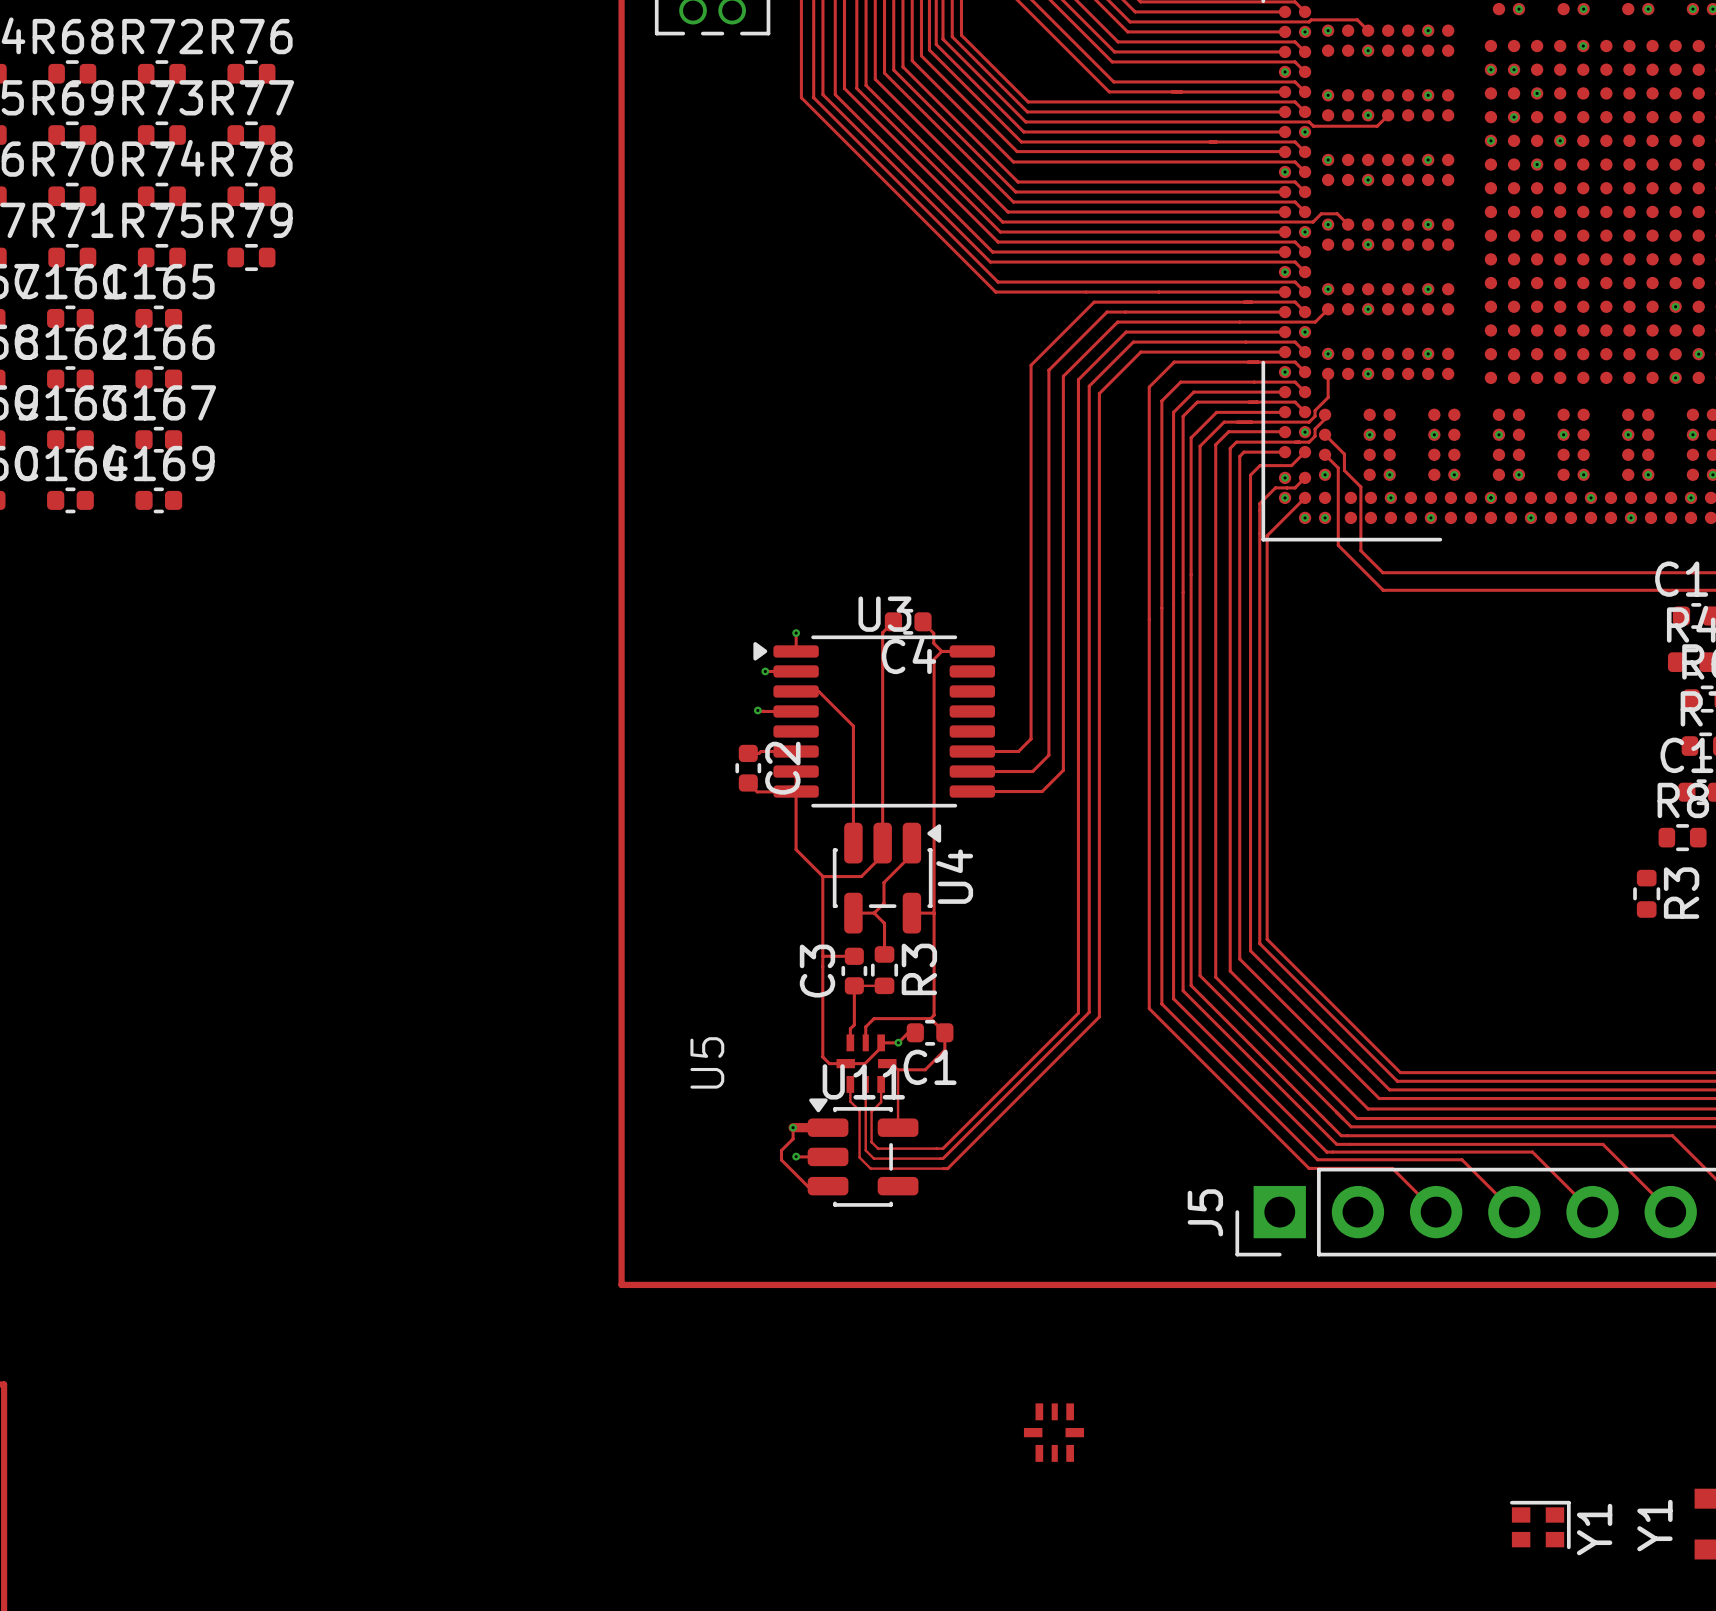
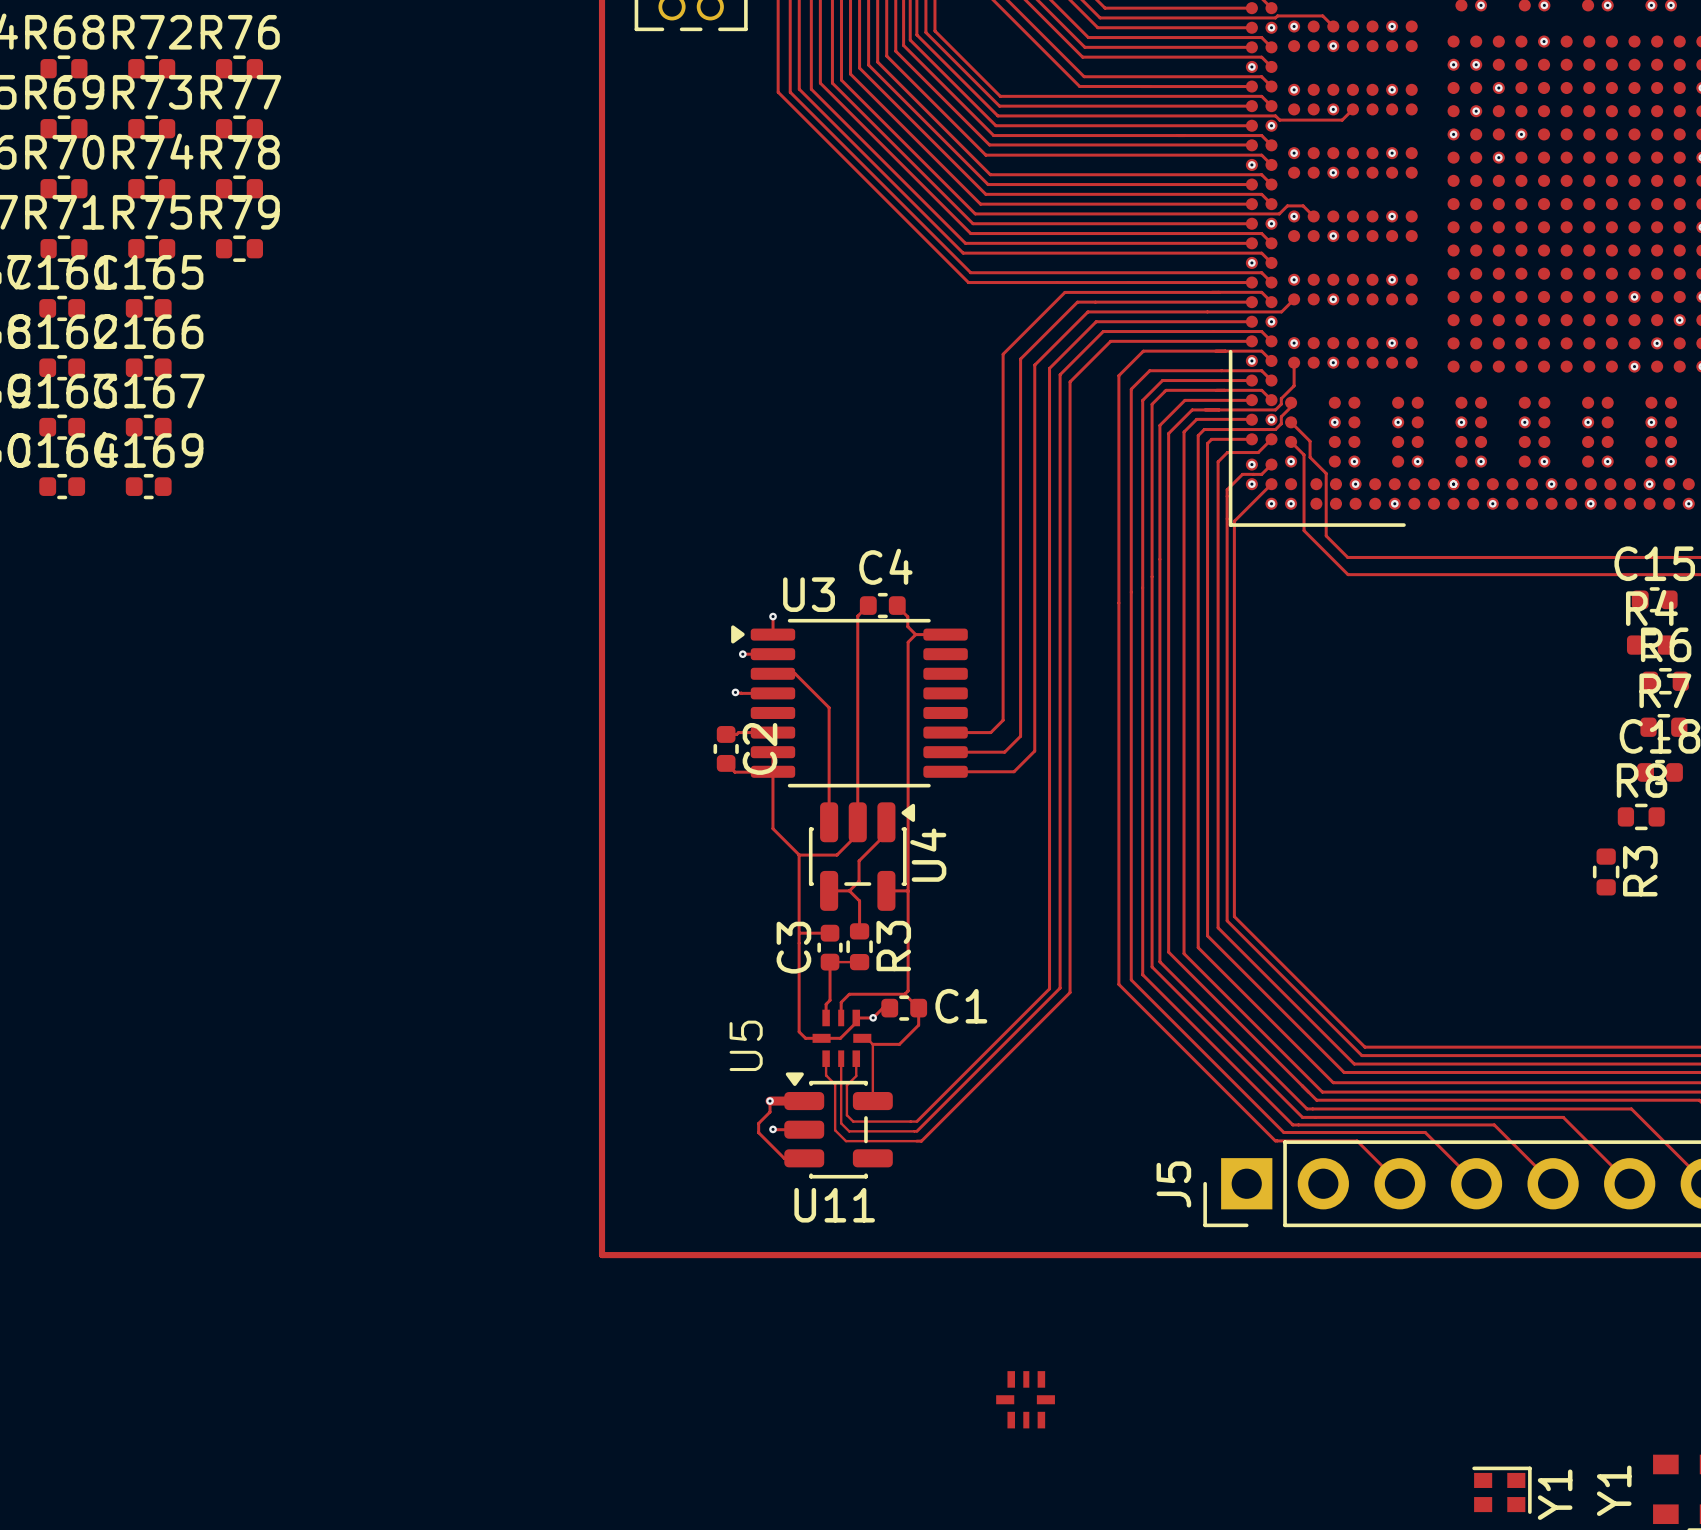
U3 name position: U3 (884, 614) -> U3 (809, 594)
C4 name position: C4 (908, 655) -> C4 (885, 566)
U5 name position: U5 (707, 1062) -> U5 (746, 1045)
C1 name position: C1 (930, 1067) -> C1 (961, 1006)
U11 name position: U11 (863, 1081) -> U11 (834, 1205)

